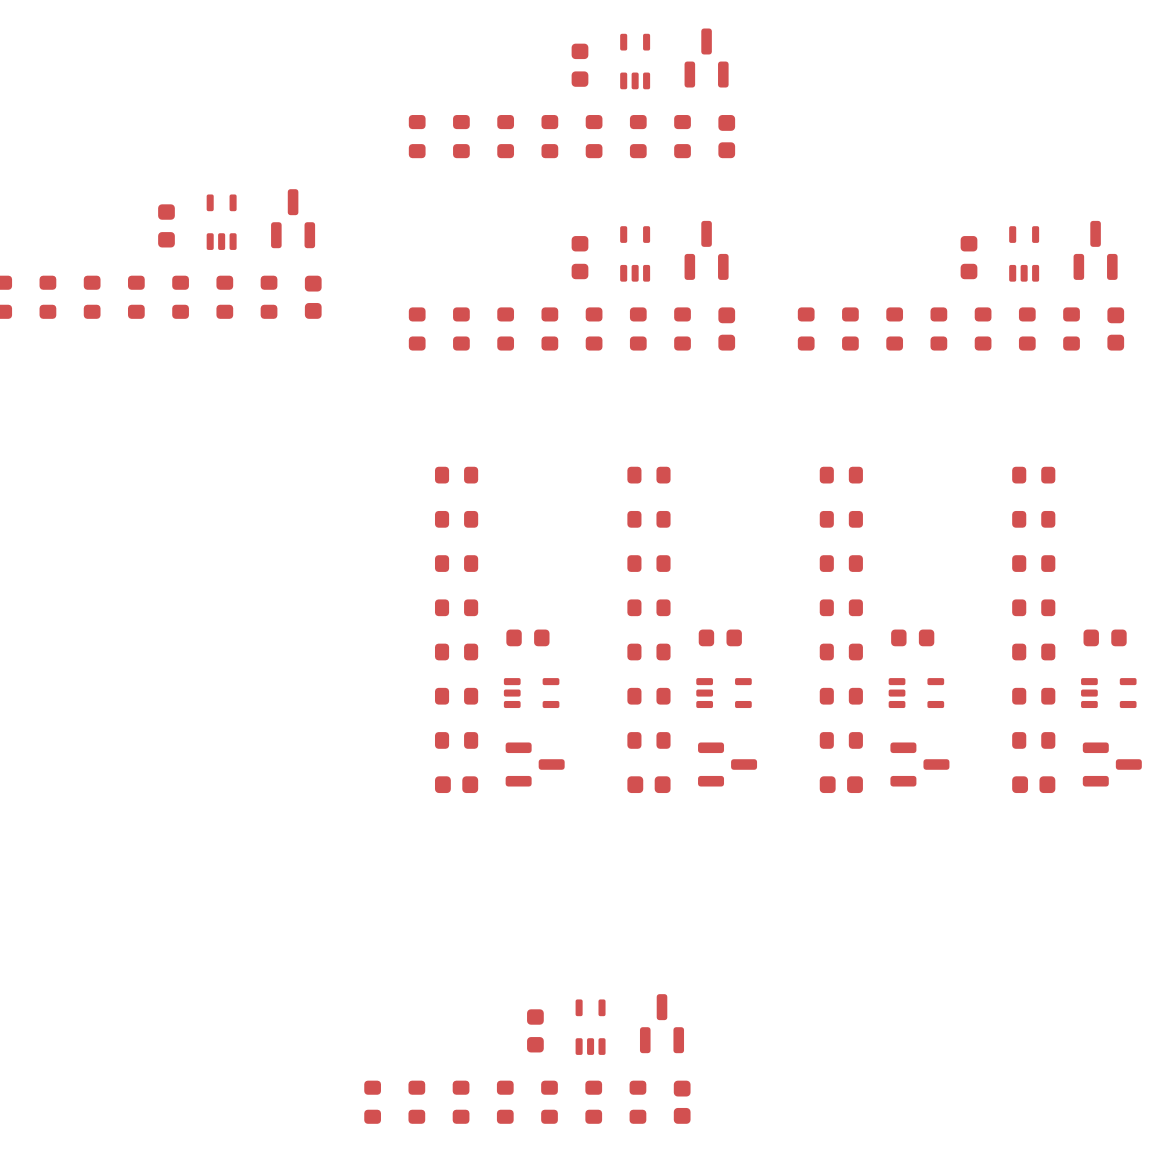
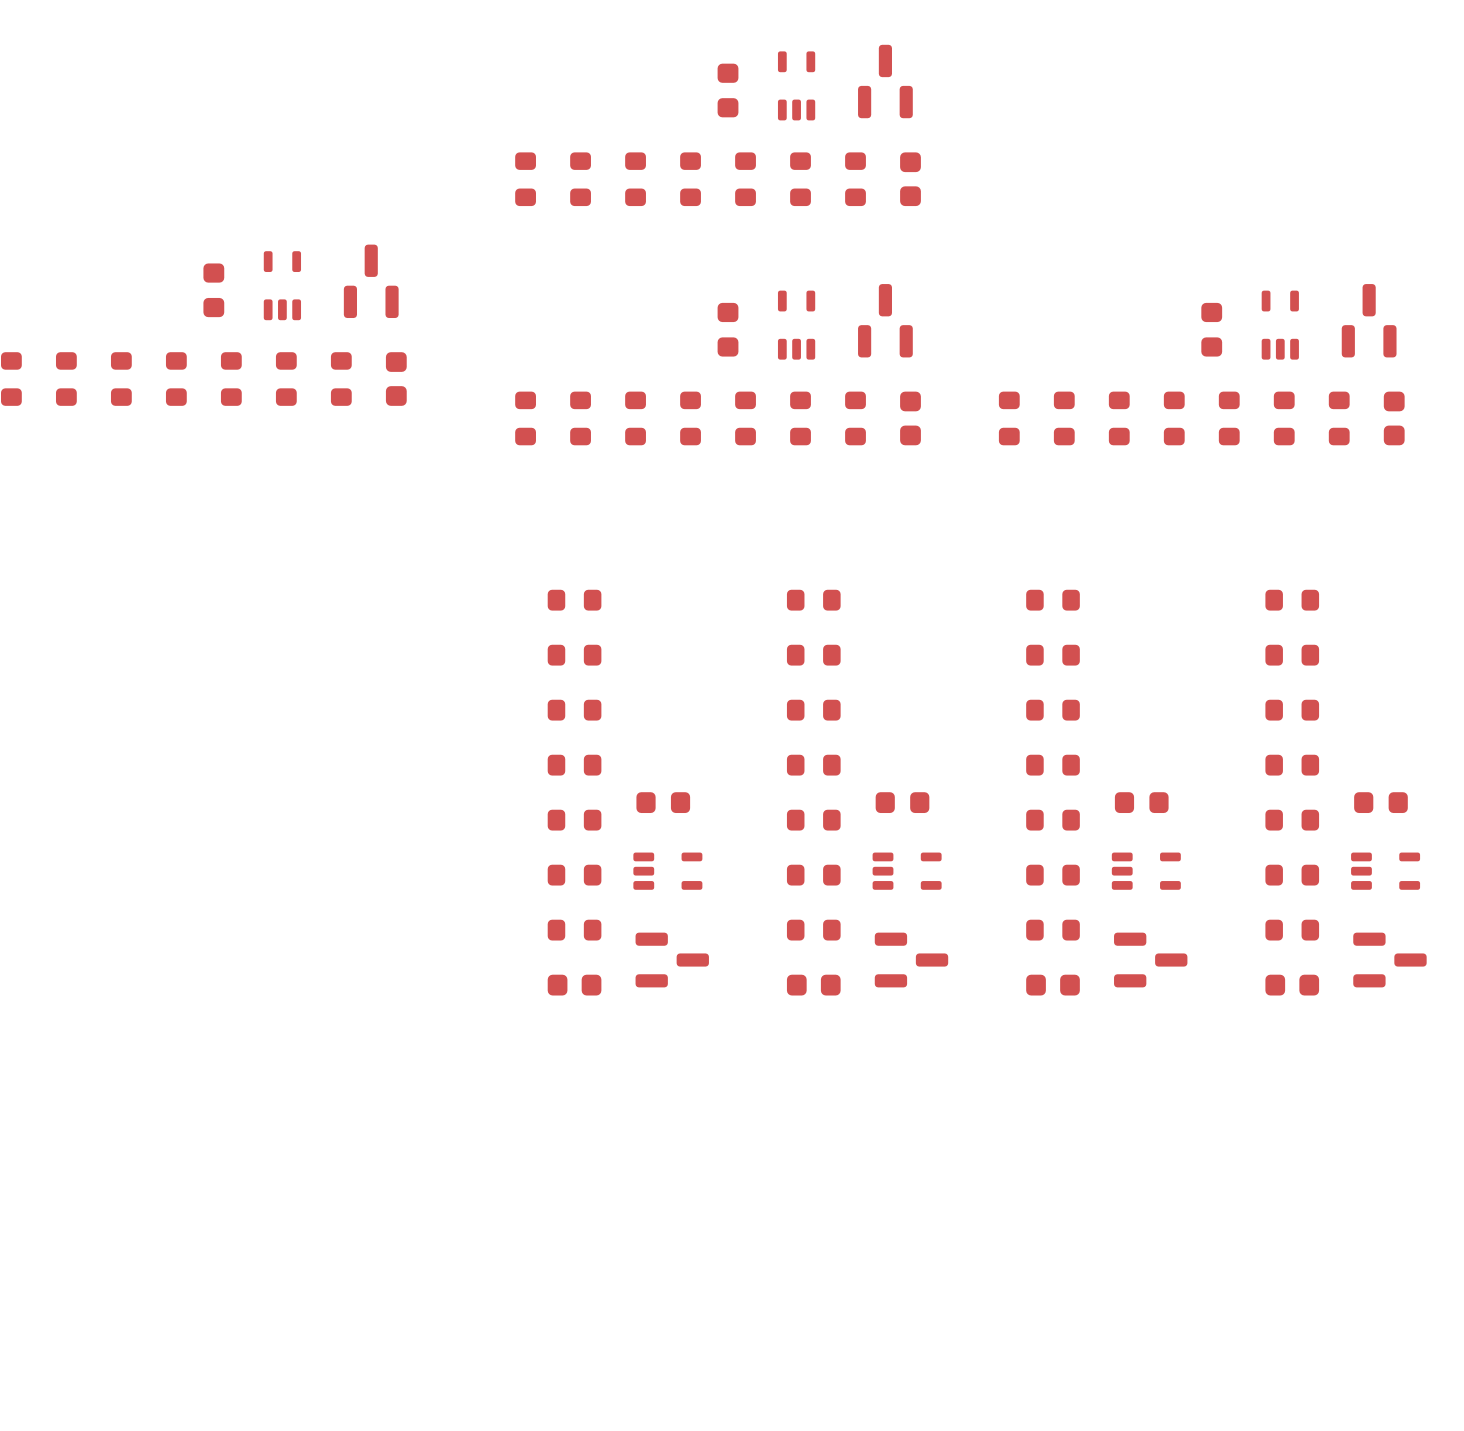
part: (662, 1023) -> none
part: (590, 1027) -> none
part: (535, 1030) -> none
part: (372, 1102) -> none
part: (416, 1102) -> none
part: (461, 1102) -> none
part: (505, 1102) -> none
part: (549, 1102) -> none
part: (593, 1102) -> none
part: (637, 1102) -> none
part: (682, 1102) -> none

